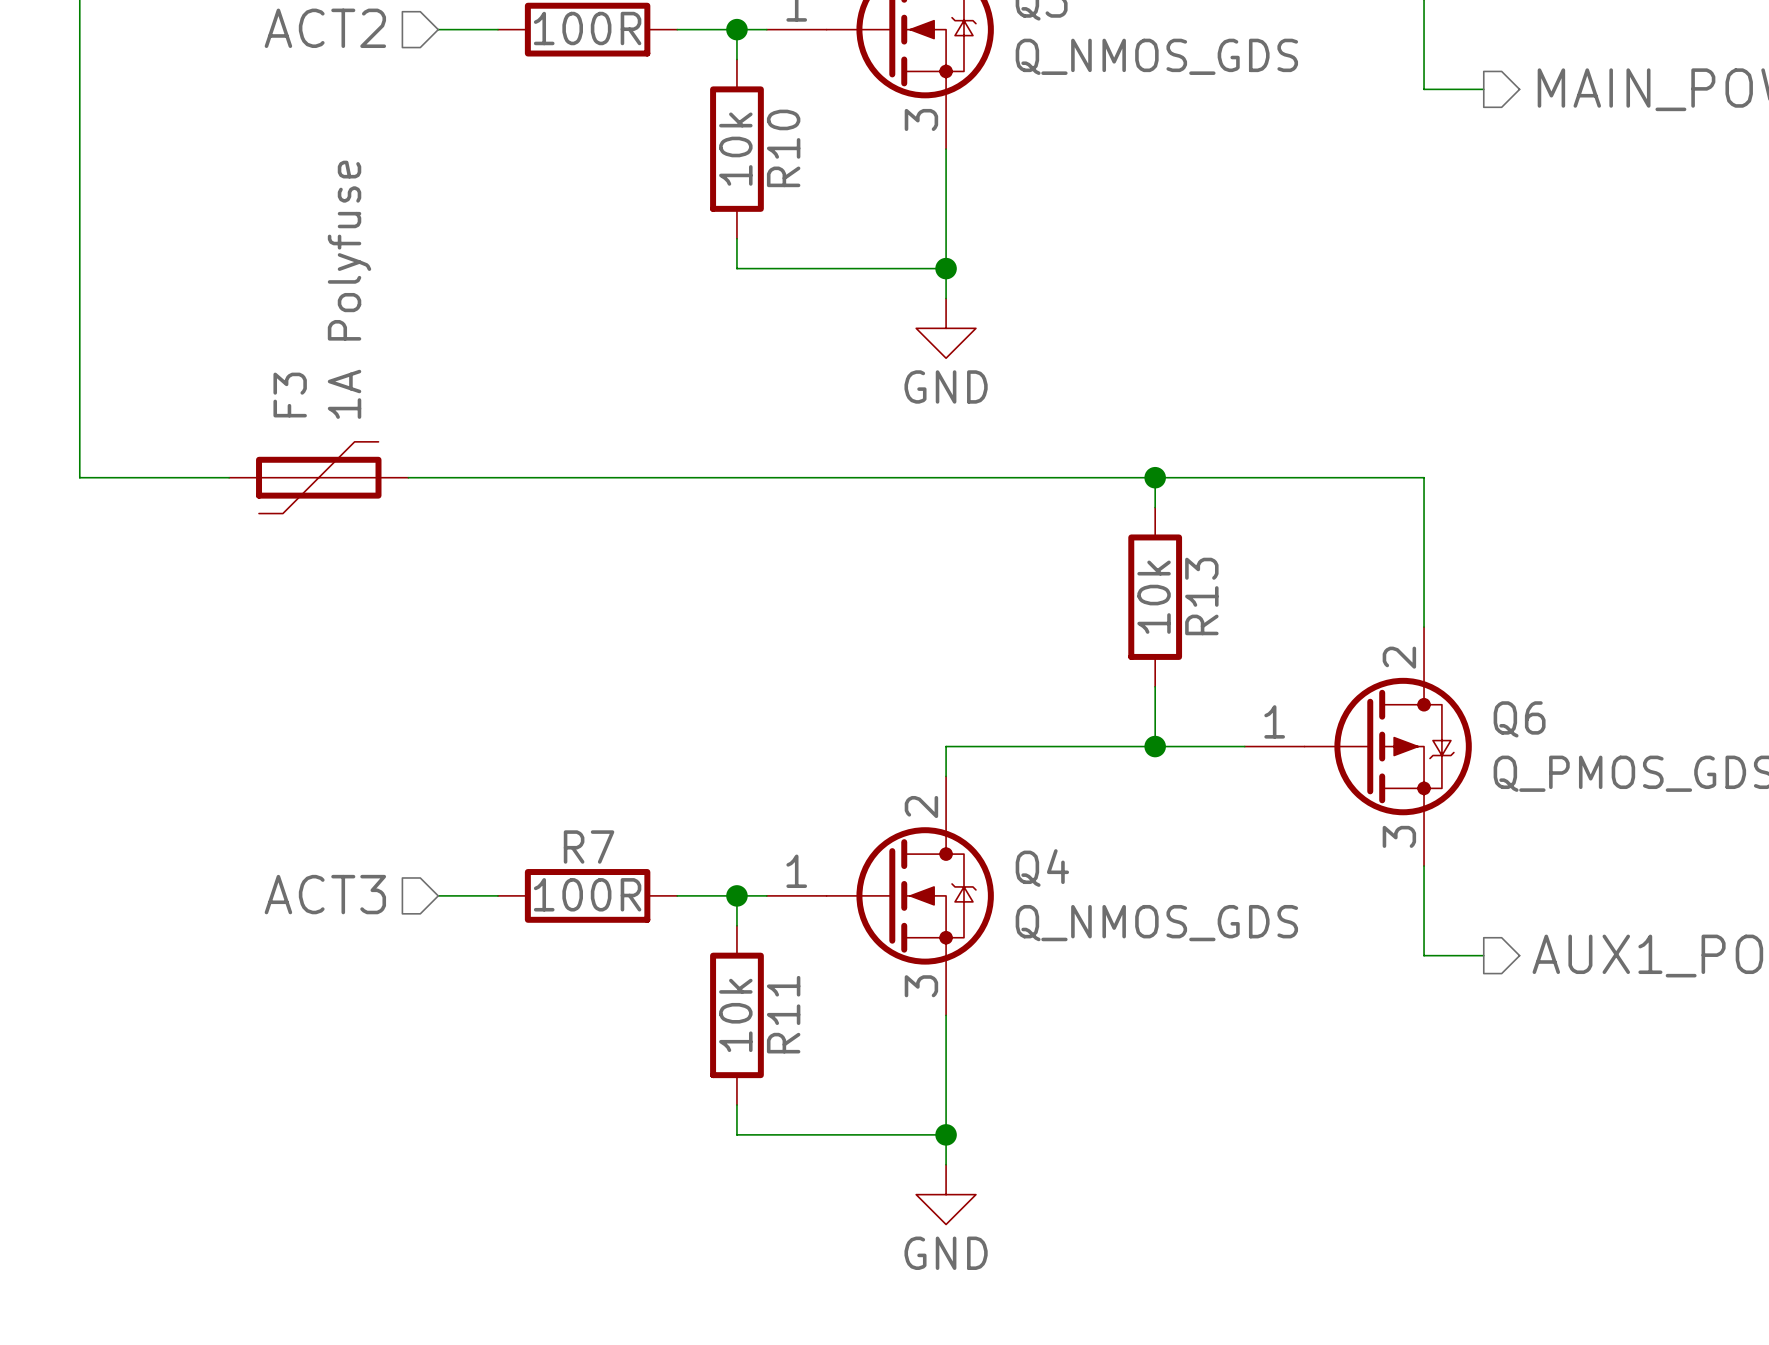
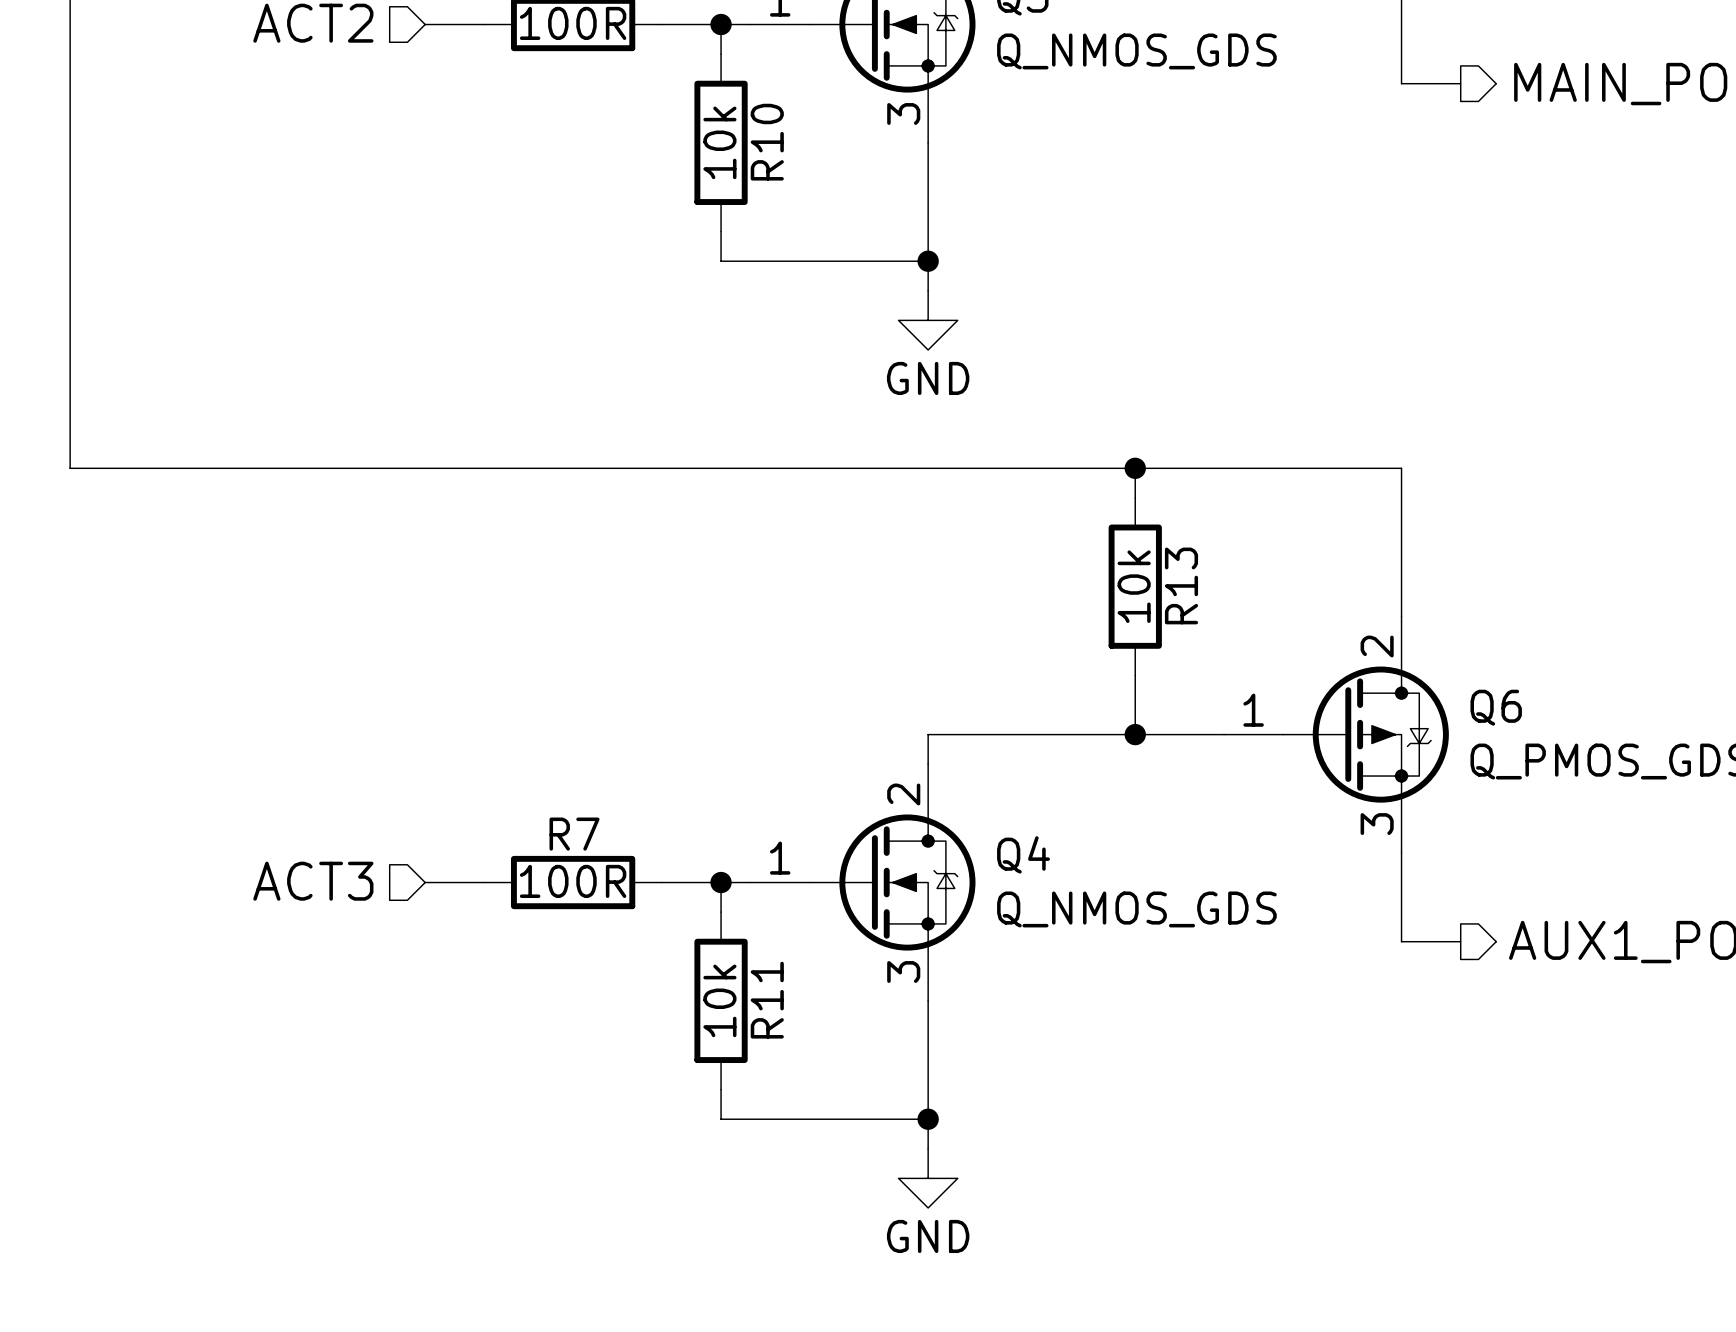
F3: 1A Polyfuse (318, 477) -> none

